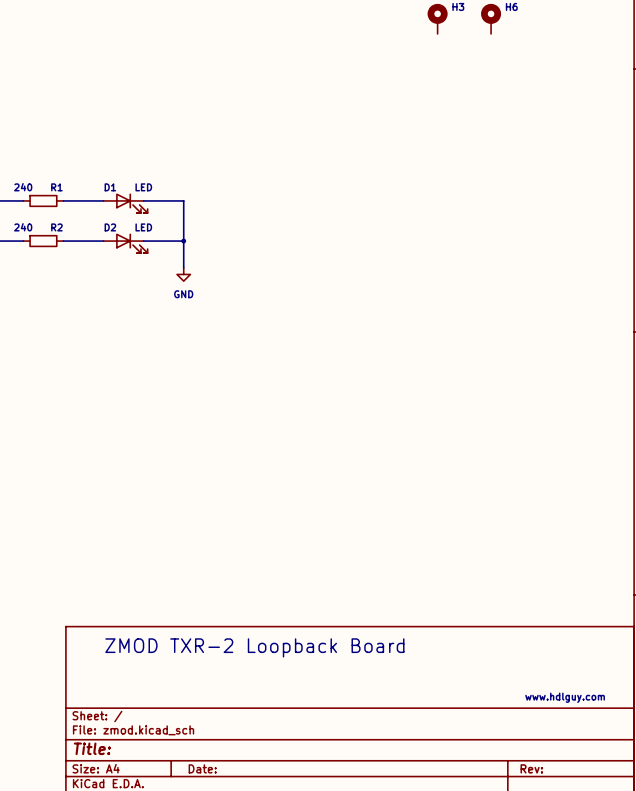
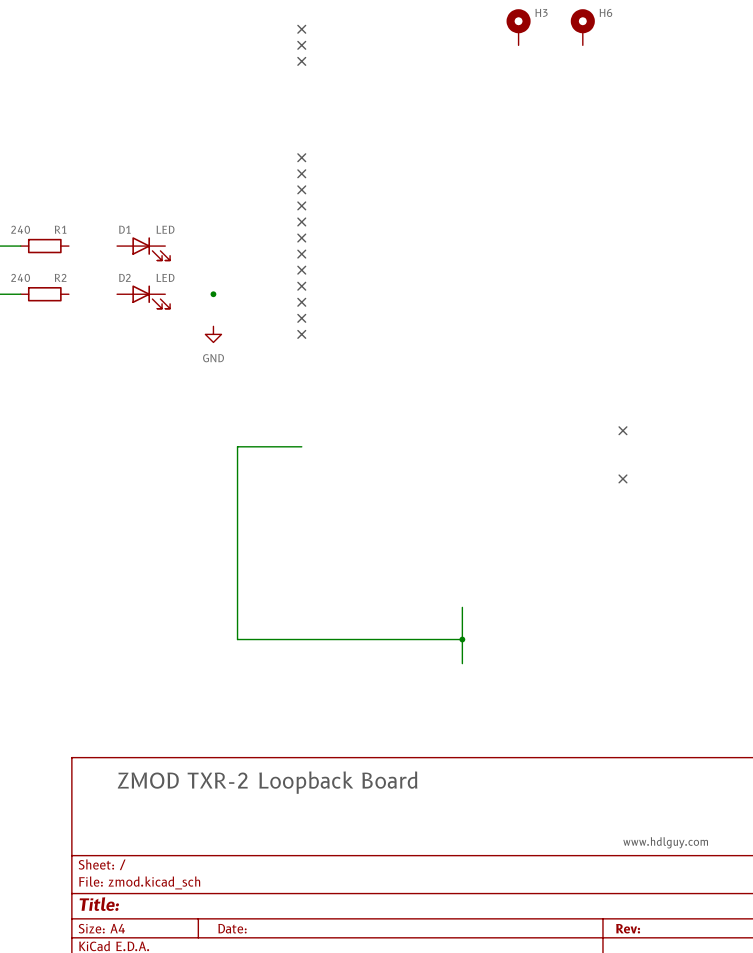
no-connect mark: none -> (301, 29)
no-connect mark: none -> (301, 45)
no-connect mark: none -> (301, 61)
no-connect mark: none -> (301, 157)
no-connect mark: none -> (301, 173)
no-connect mark: none -> (301, 189)
no-connect mark: none -> (301, 205)
no-connect mark: none -> (301, 221)
no-connect mark: none -> (301, 238)
wire: (63, 200) (103, 200) -> none
wire: (143, 200) (183, 200) (183, 267) -> none
no-connect mark: none -> (301, 254)
no-connect mark: none -> (301, 270)
no-connect mark: none -> (301, 286)
wire: (63, 241) (103, 241) -> none
wire: (143, 241) (183, 241) -> none
no-connect mark: none -> (301, 302)
no-connect mark: none -> (301, 318)
no-connect mark: none -> (301, 334)
no-connect mark: none -> (622, 430)
wire: none -> (301, 446) (237, 446) (237, 639) (462, 639)
no-connect mark: none -> (622, 478)
wire: none -> (462, 607) (462, 663)
junction: none -> (462, 639)

